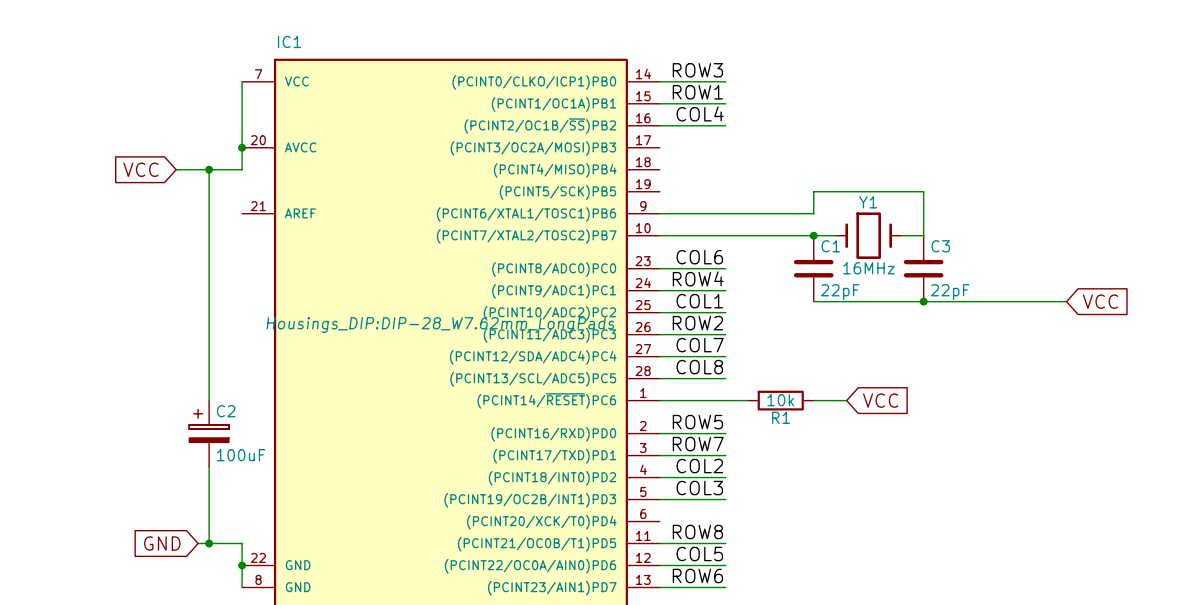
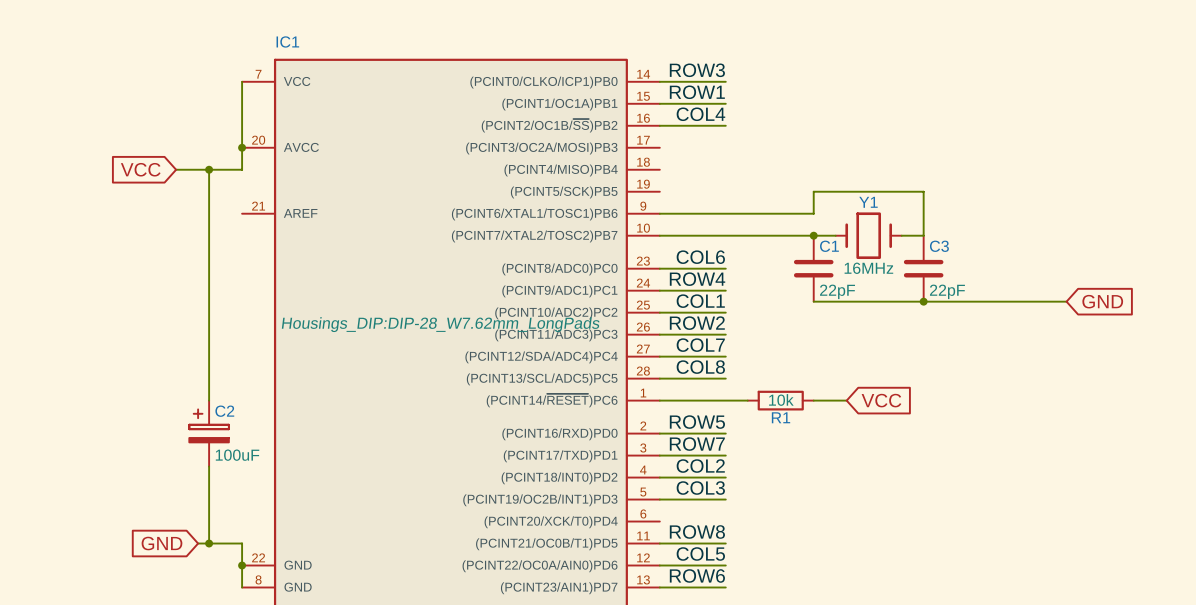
global label: VCC (1100, 301) -> GND (1102, 301)

